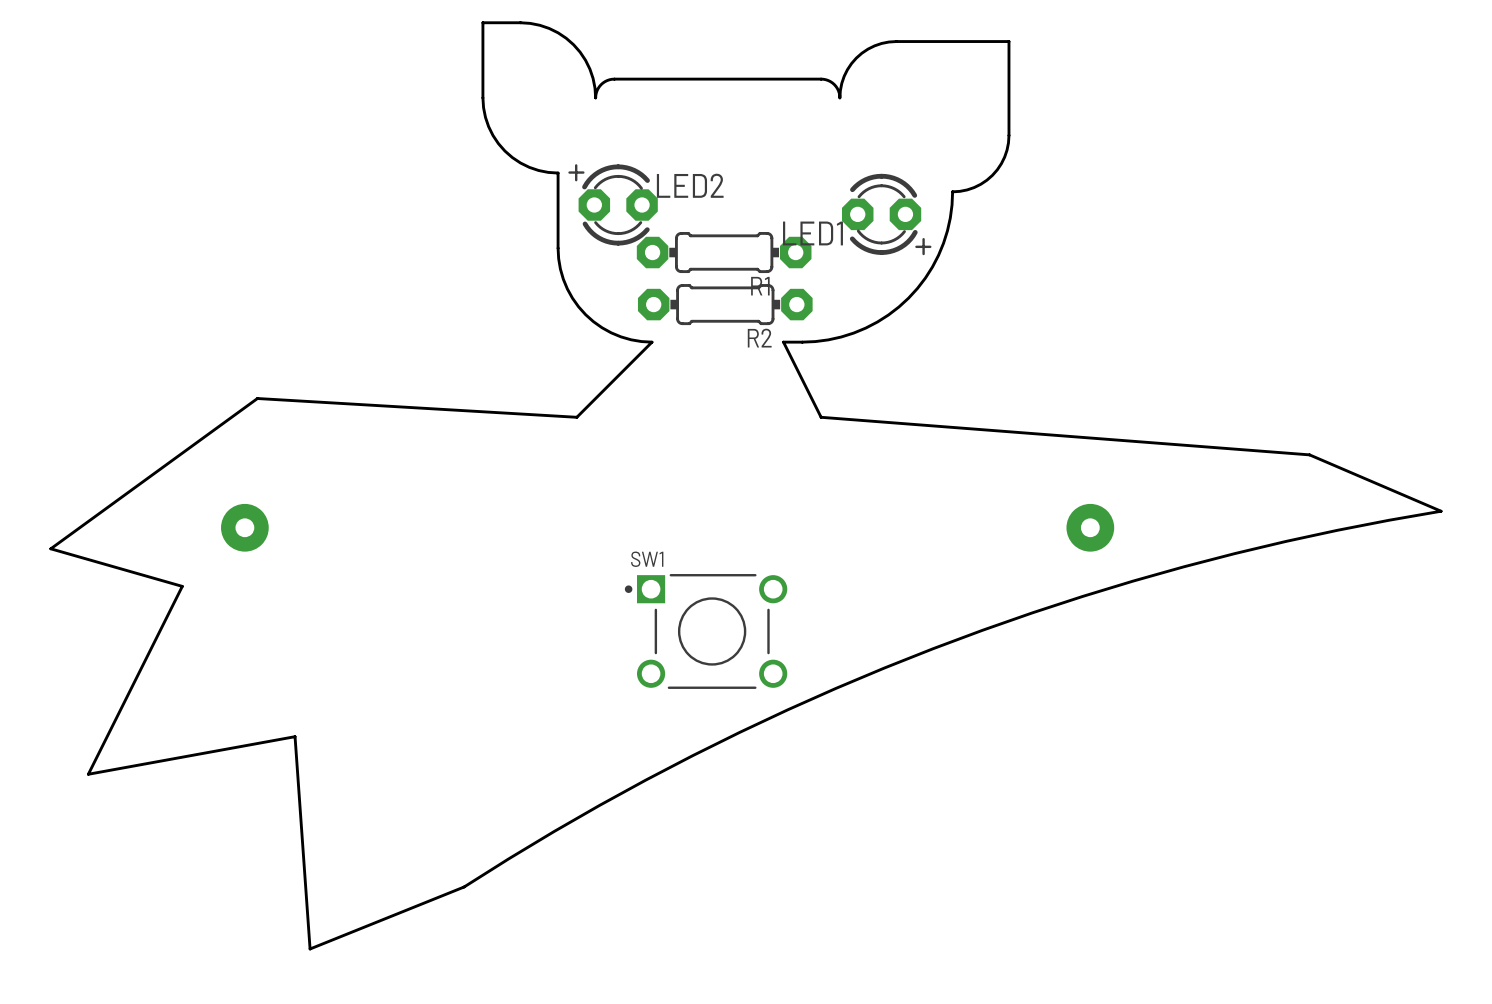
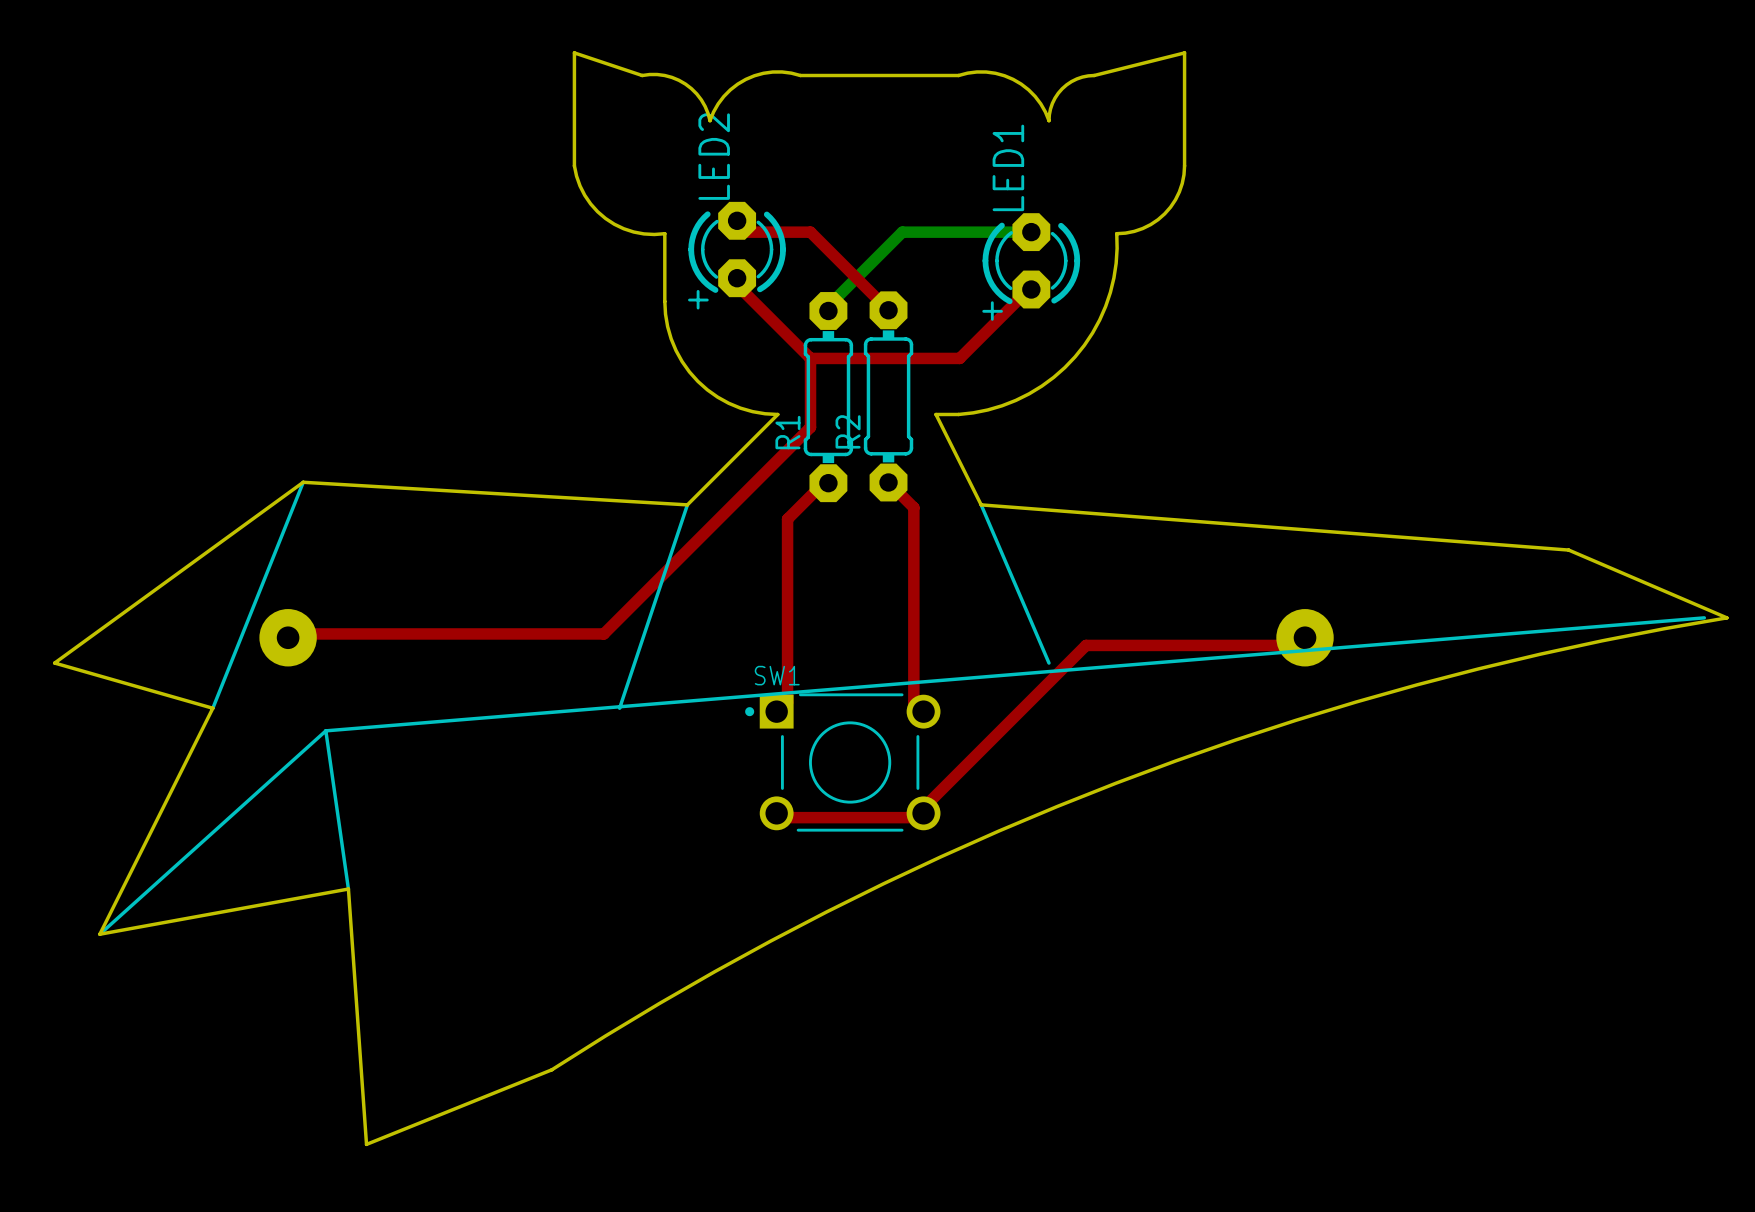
board edge: (482, 41) (482, 22) (530, 23) (558, 32) (573, 44) (585, 60) (593, 78) (595, 97) (601, 84) (614, 79) (823, 79) (836, 86) (839, 97) (841, 83) (851, 63) (861, 53) (881, 43) (896, 41) (1008, 41) (1008, 135) (1004, 157) (997, 169) (986, 180) (967, 189) (952, 191) (947, 230) (938, 255) (925, 278) (898, 306) (865, 328) (828, 339) (802, 342) -> (574, 52) (642, 75) (657, 74) (678, 80) (696, 93) (705, 106) (710, 120) (718, 103) (737, 84) (763, 73) (782, 71) (800, 75) (958, 75) (976, 71) (995, 73) (1013, 79) (1028, 89) (1040, 103) (1048, 120) (1050, 109) (1055, 98) (1062, 88) (1071, 81) (1082, 77) (1184, 52) (1184, 165) (1182, 183) (1170, 207) (1158, 219) (1134, 231) (1116, 233) (1113, 277) (1105, 306) (1092, 332) (1075, 356) (1041, 386) (1002, 405) (958, 414)
board edge: (482, 97) (485, 117) (498, 143) (520, 162) (538, 170) (558, 173) (558, 191) -> (574, 120) (574, 165) (580, 185) (590, 203) (605, 218) (623, 228) (643, 233) (664, 233)
top track: none -> (737, 220) (741, 232) (810, 232) (888, 310)
bottom track: none -> (1031, 232) (902, 232) (833, 301) (828, 310)
LED2 rotation: 0° (613, 204) -> 90° counterclockwise (736, 255)
LED1 rotation: 0° (886, 214) -> 90° clockwise (1031, 266)
top track: none -> (737, 278) (741, 289) (810, 358)
top track: none -> (1031, 289) (1028, 289) (959, 358) (810, 358)
R1 rotation: 0° (724, 252) -> 90° clockwise (828, 397)
top track: none -> (810, 358) (810, 427) (603, 633) (293, 633) (288, 637)
R2 rotation: 0° (725, 304) -> 90° clockwise (888, 396)
line: none -> (303, 482) (212, 708)
top track: none -> (888, 482) (913, 507) (913, 702) (923, 711)
top track: none -> (828, 483) (822, 484) (787, 519) (787, 702) (776, 711)
line: none -> (687, 504) (619, 708)
line: none -> (981, 504) (1048, 663)
line: none -> (1704, 617) (325, 730)
top track: none -> (1305, 637) (1304, 645) (1086, 645) (925, 806) (923, 813) (913, 817) (787, 817) (776, 813)
line: none -> (325, 730) (348, 889)
line: none -> (325, 730) (99, 934)

